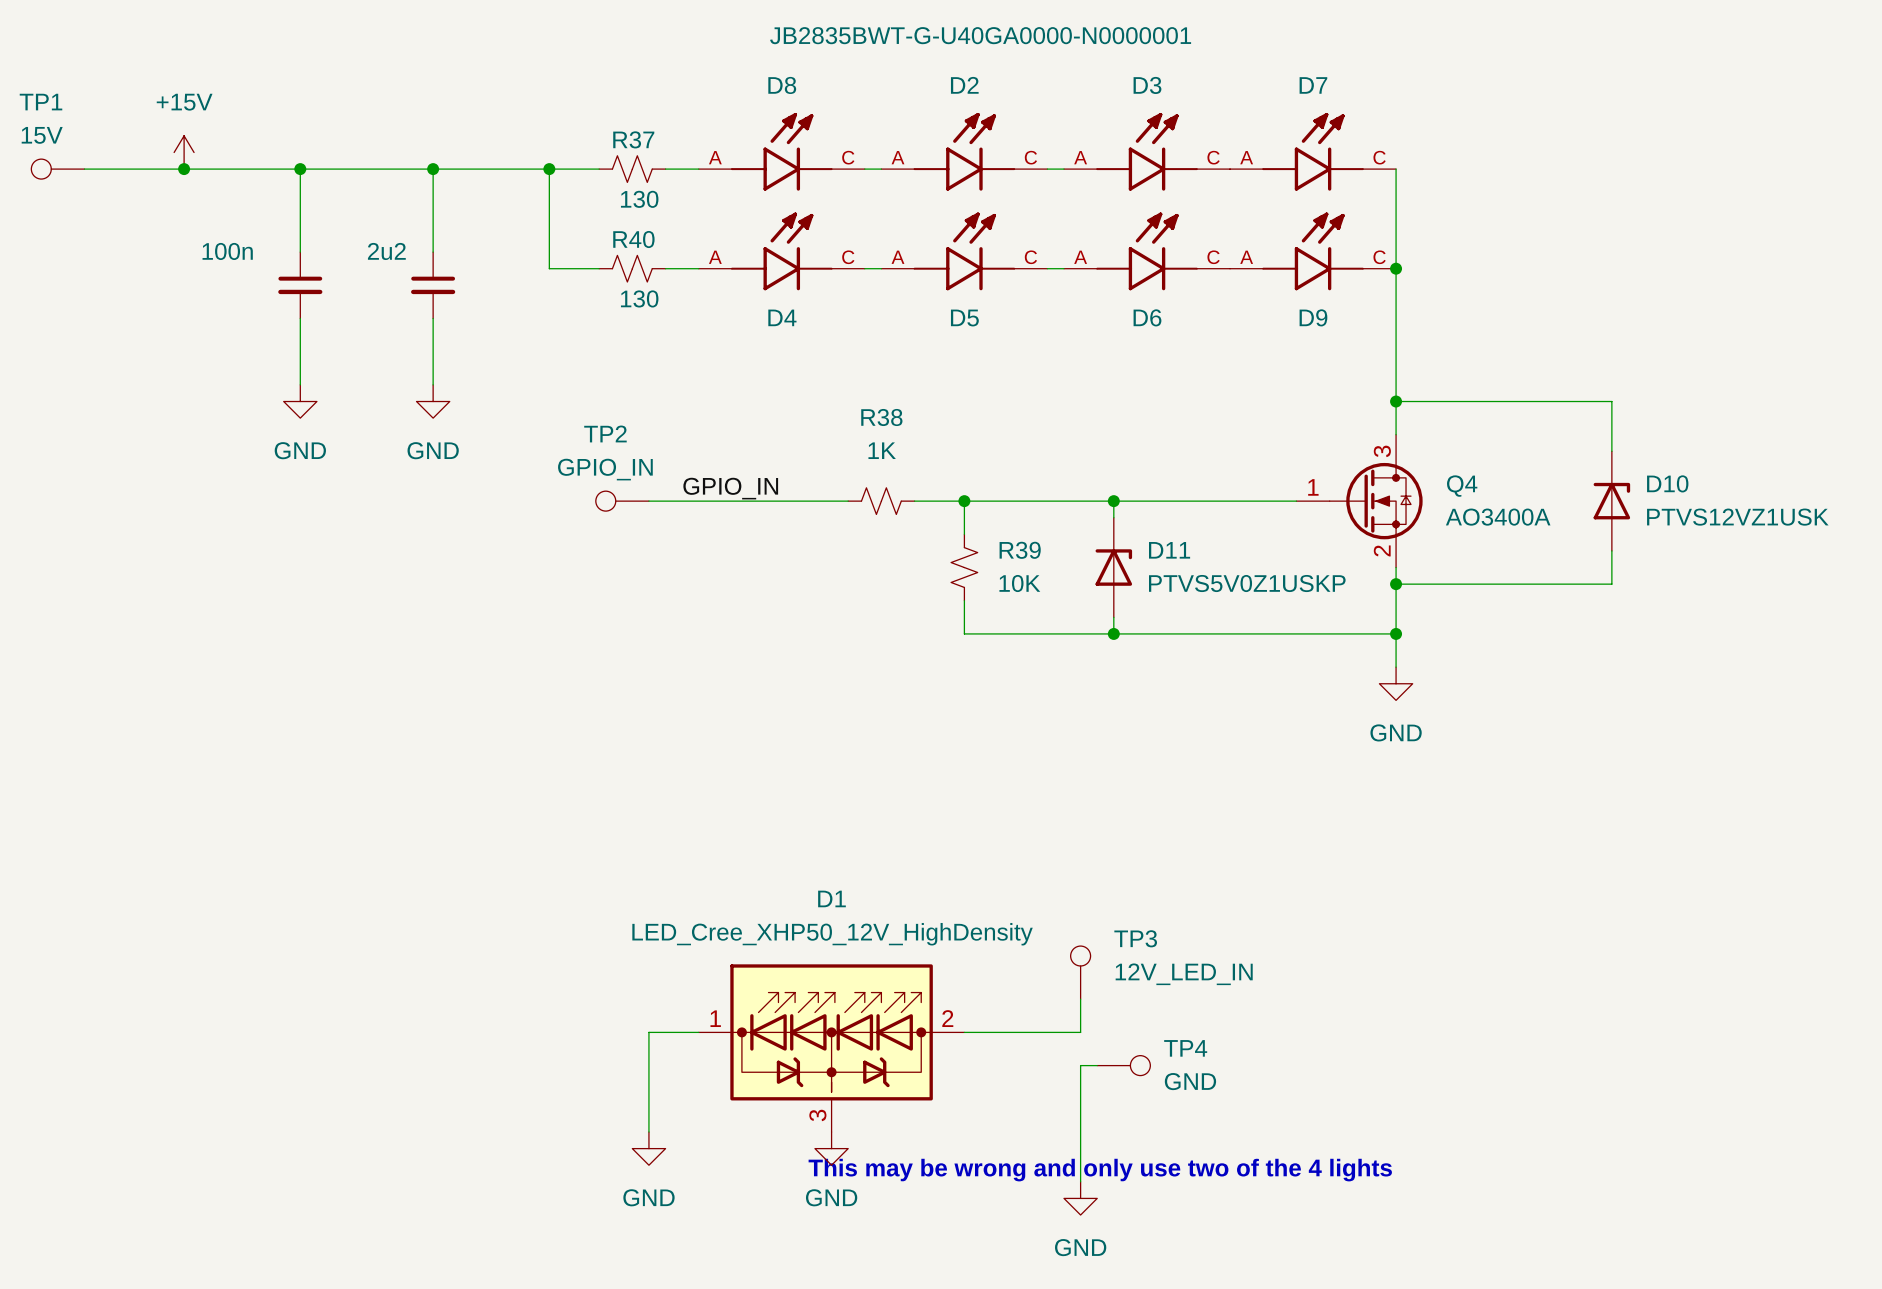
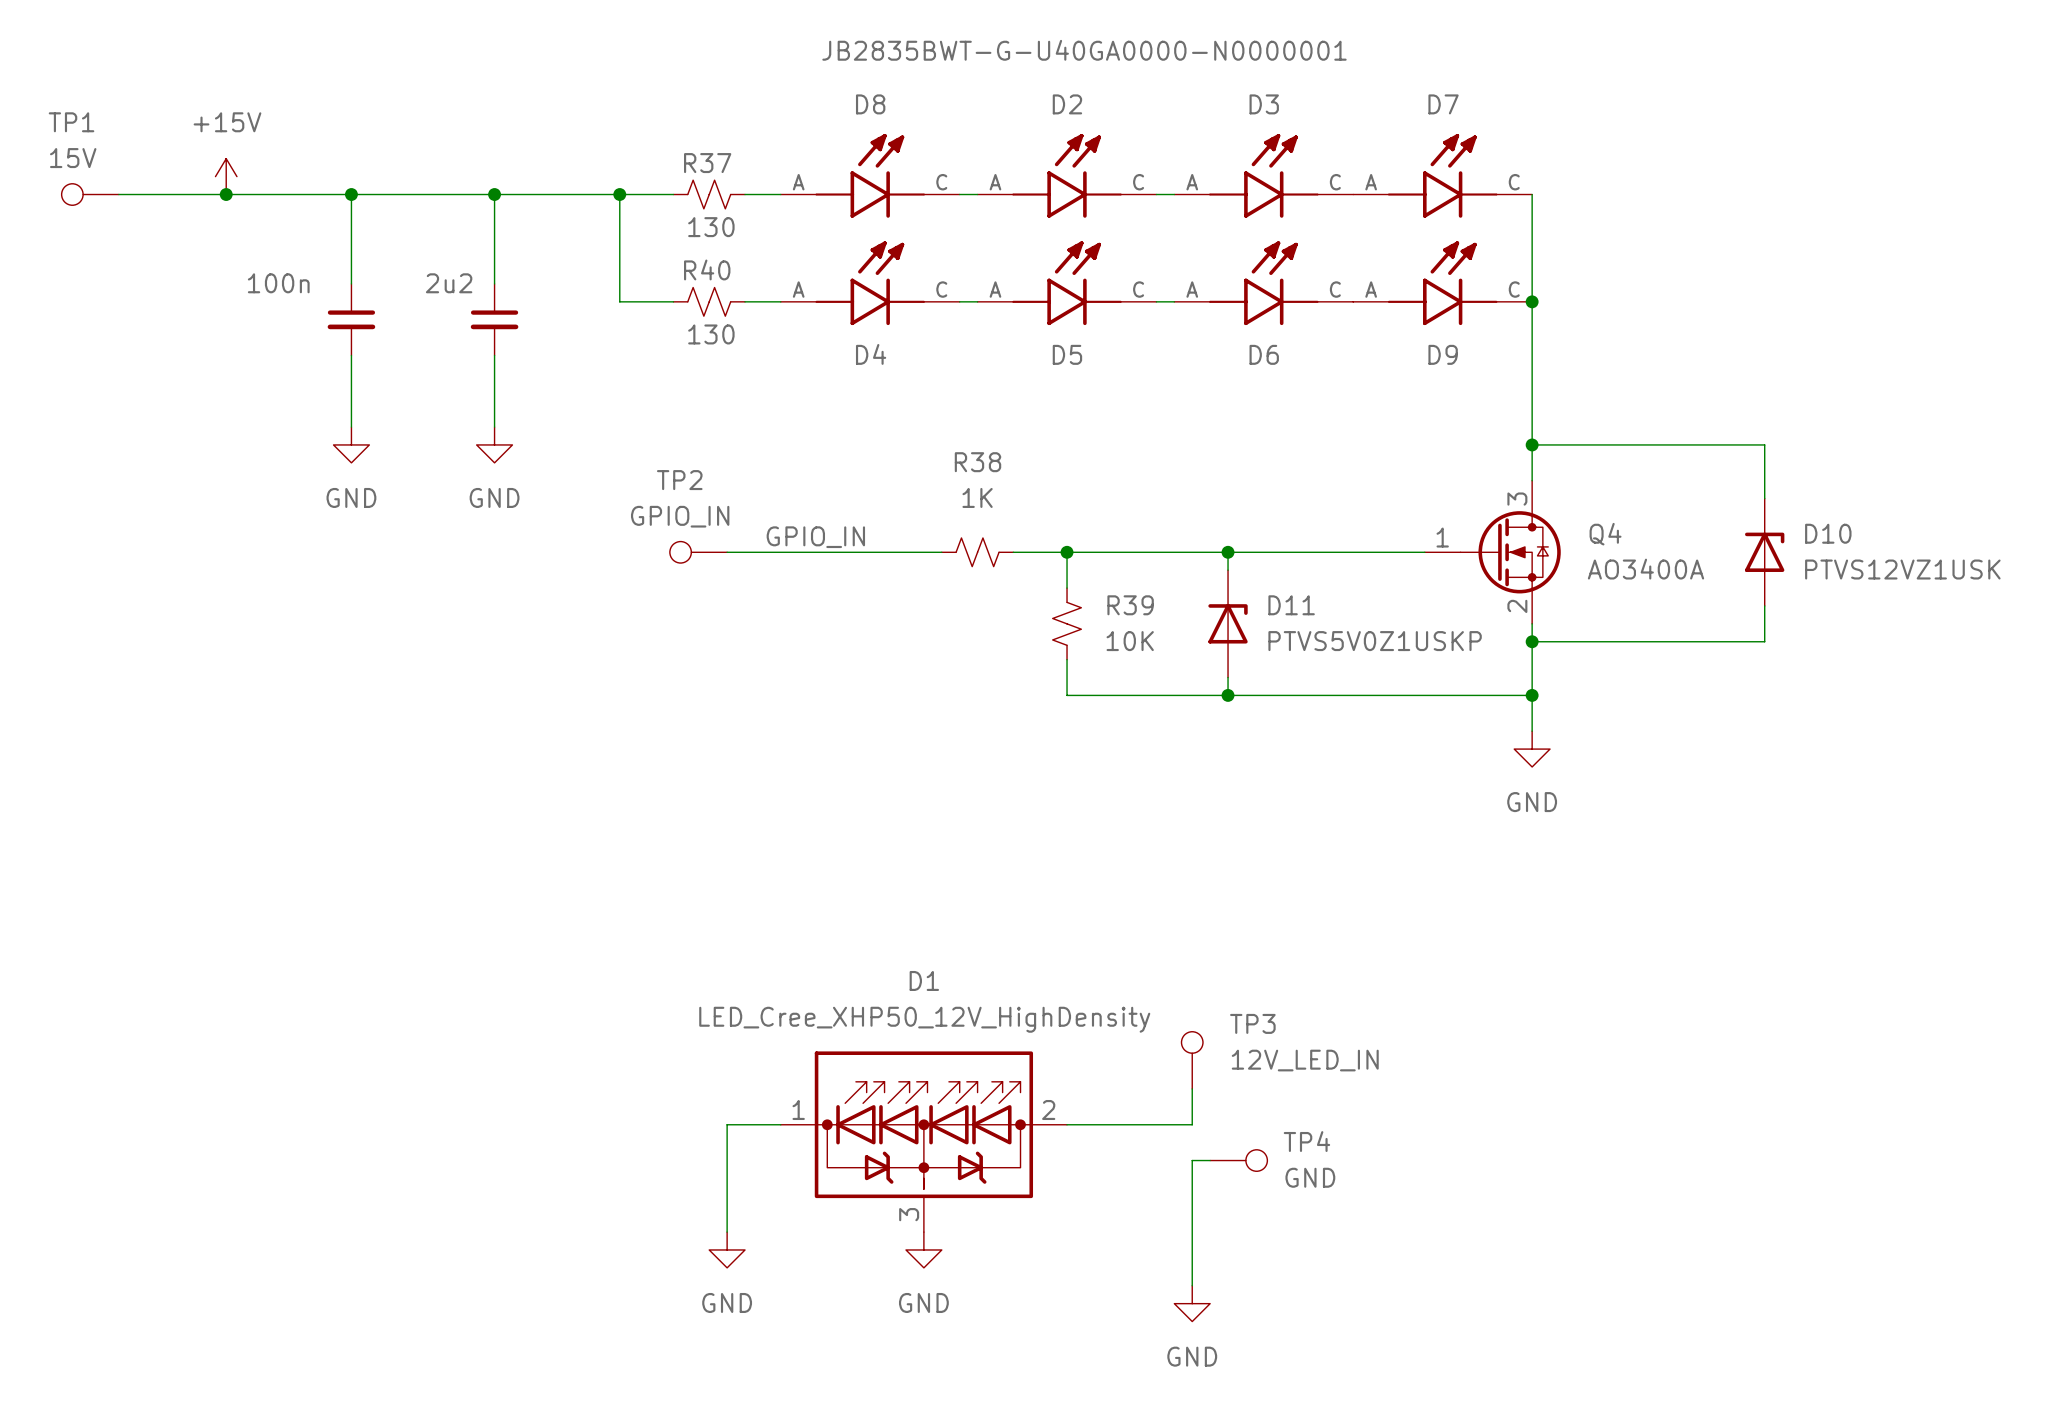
text: This may be wrong and only use two of the 4 lights (1100, 1170) -> none

